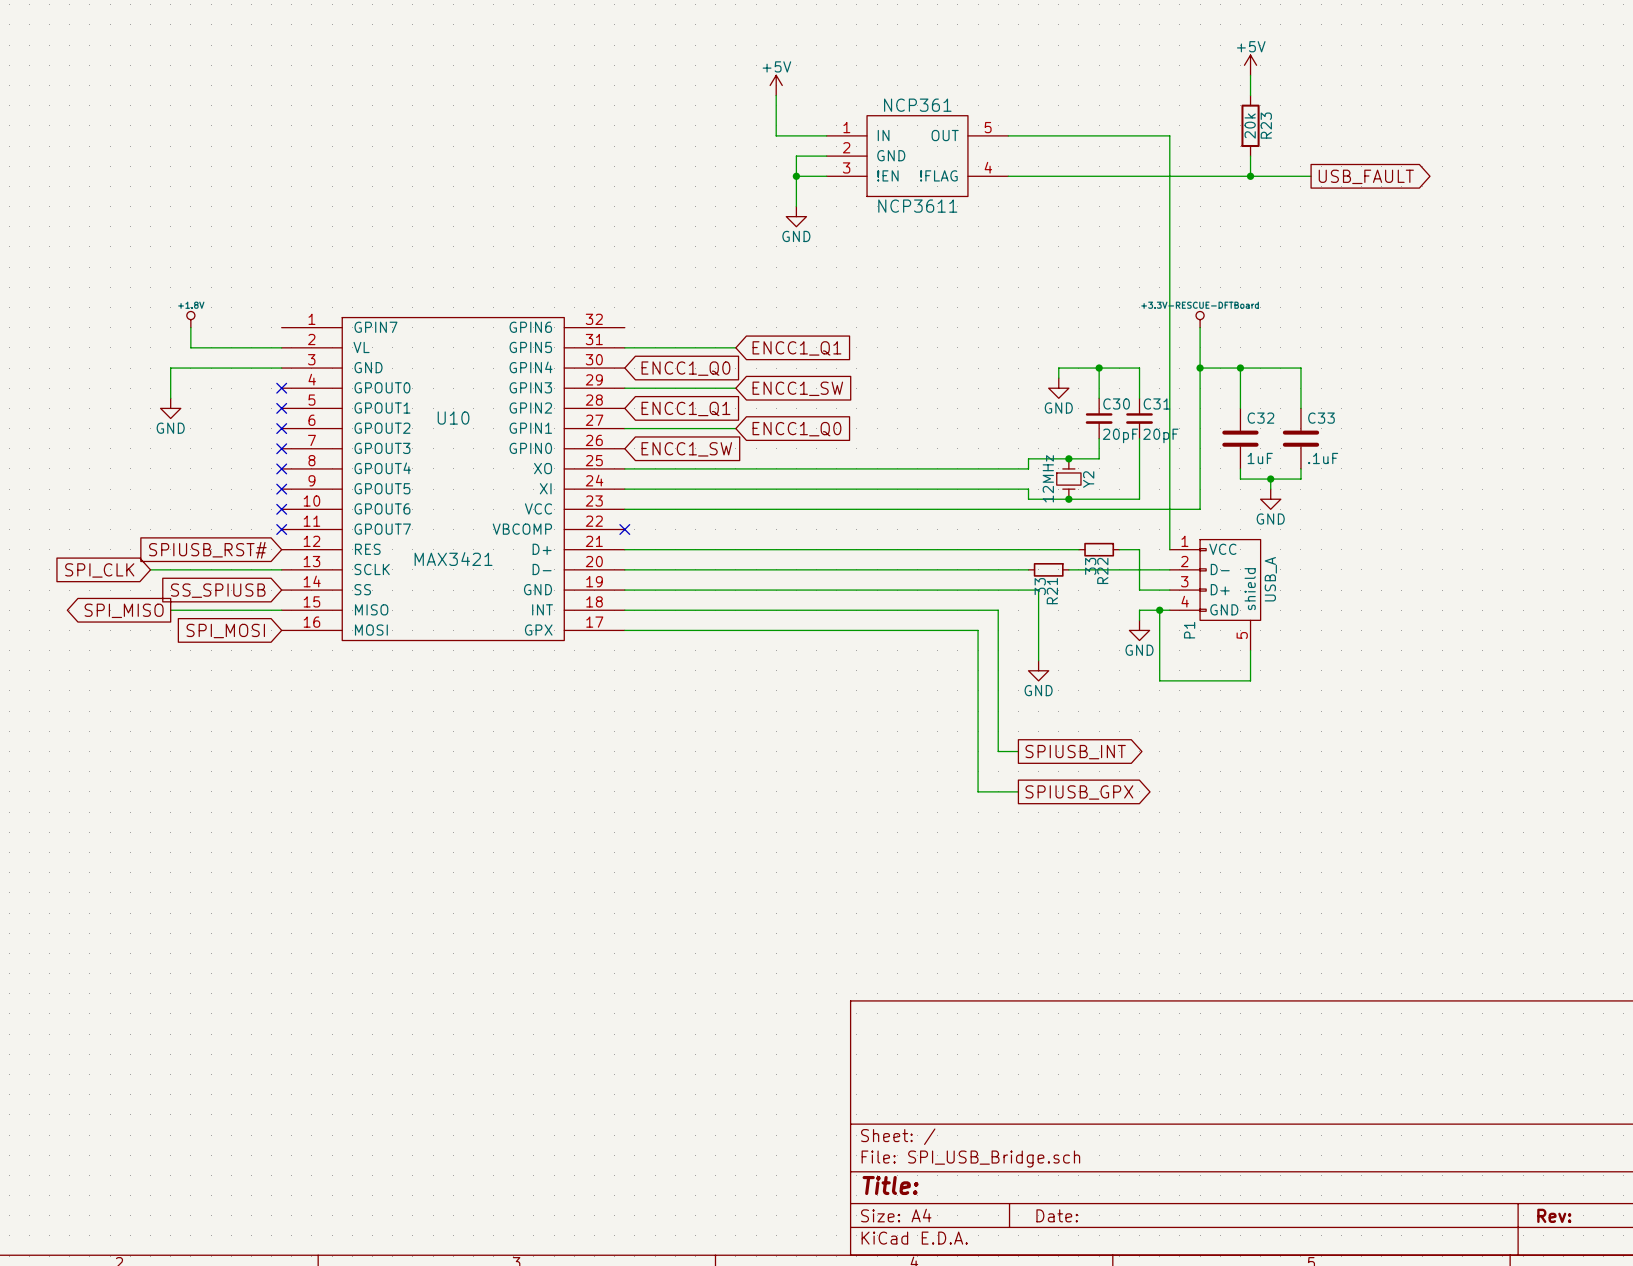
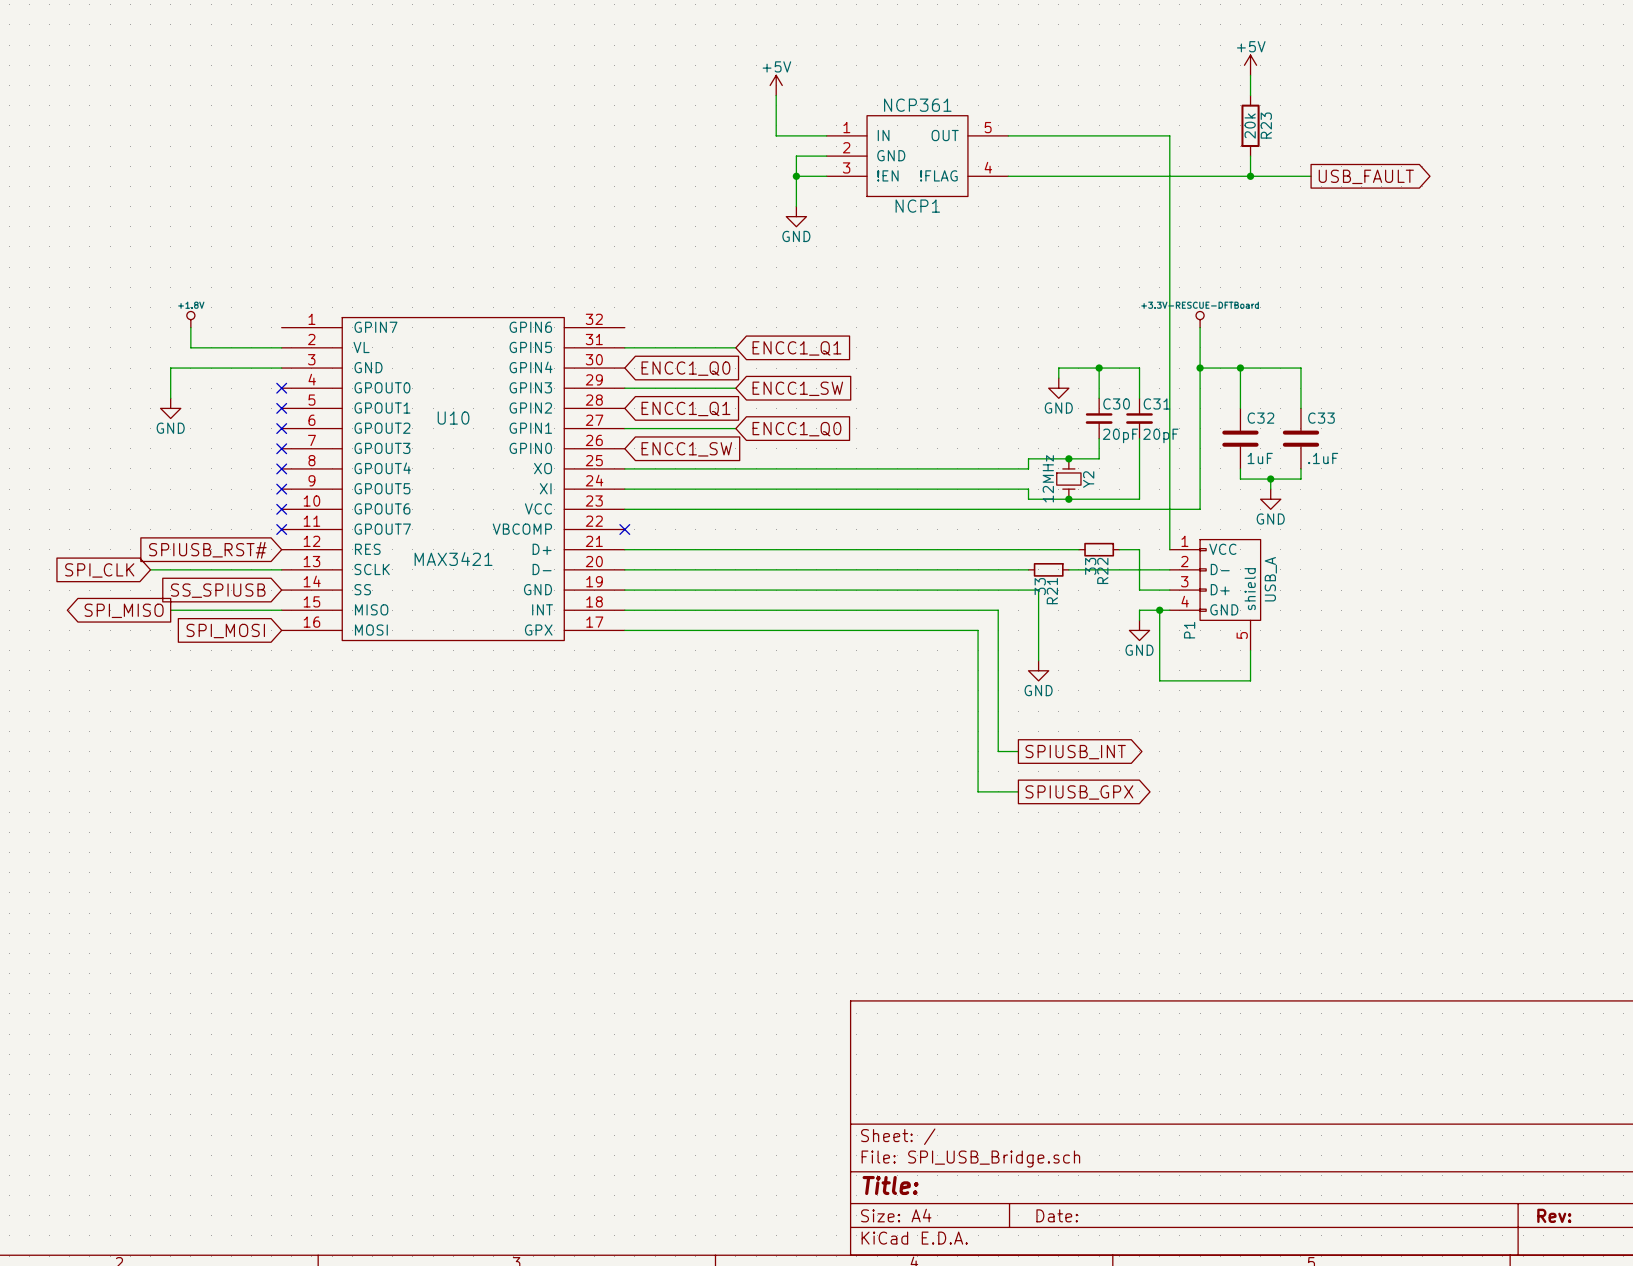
NCP3611 name: NCP3611 (917, 206) -> NCP1 (917, 206)

